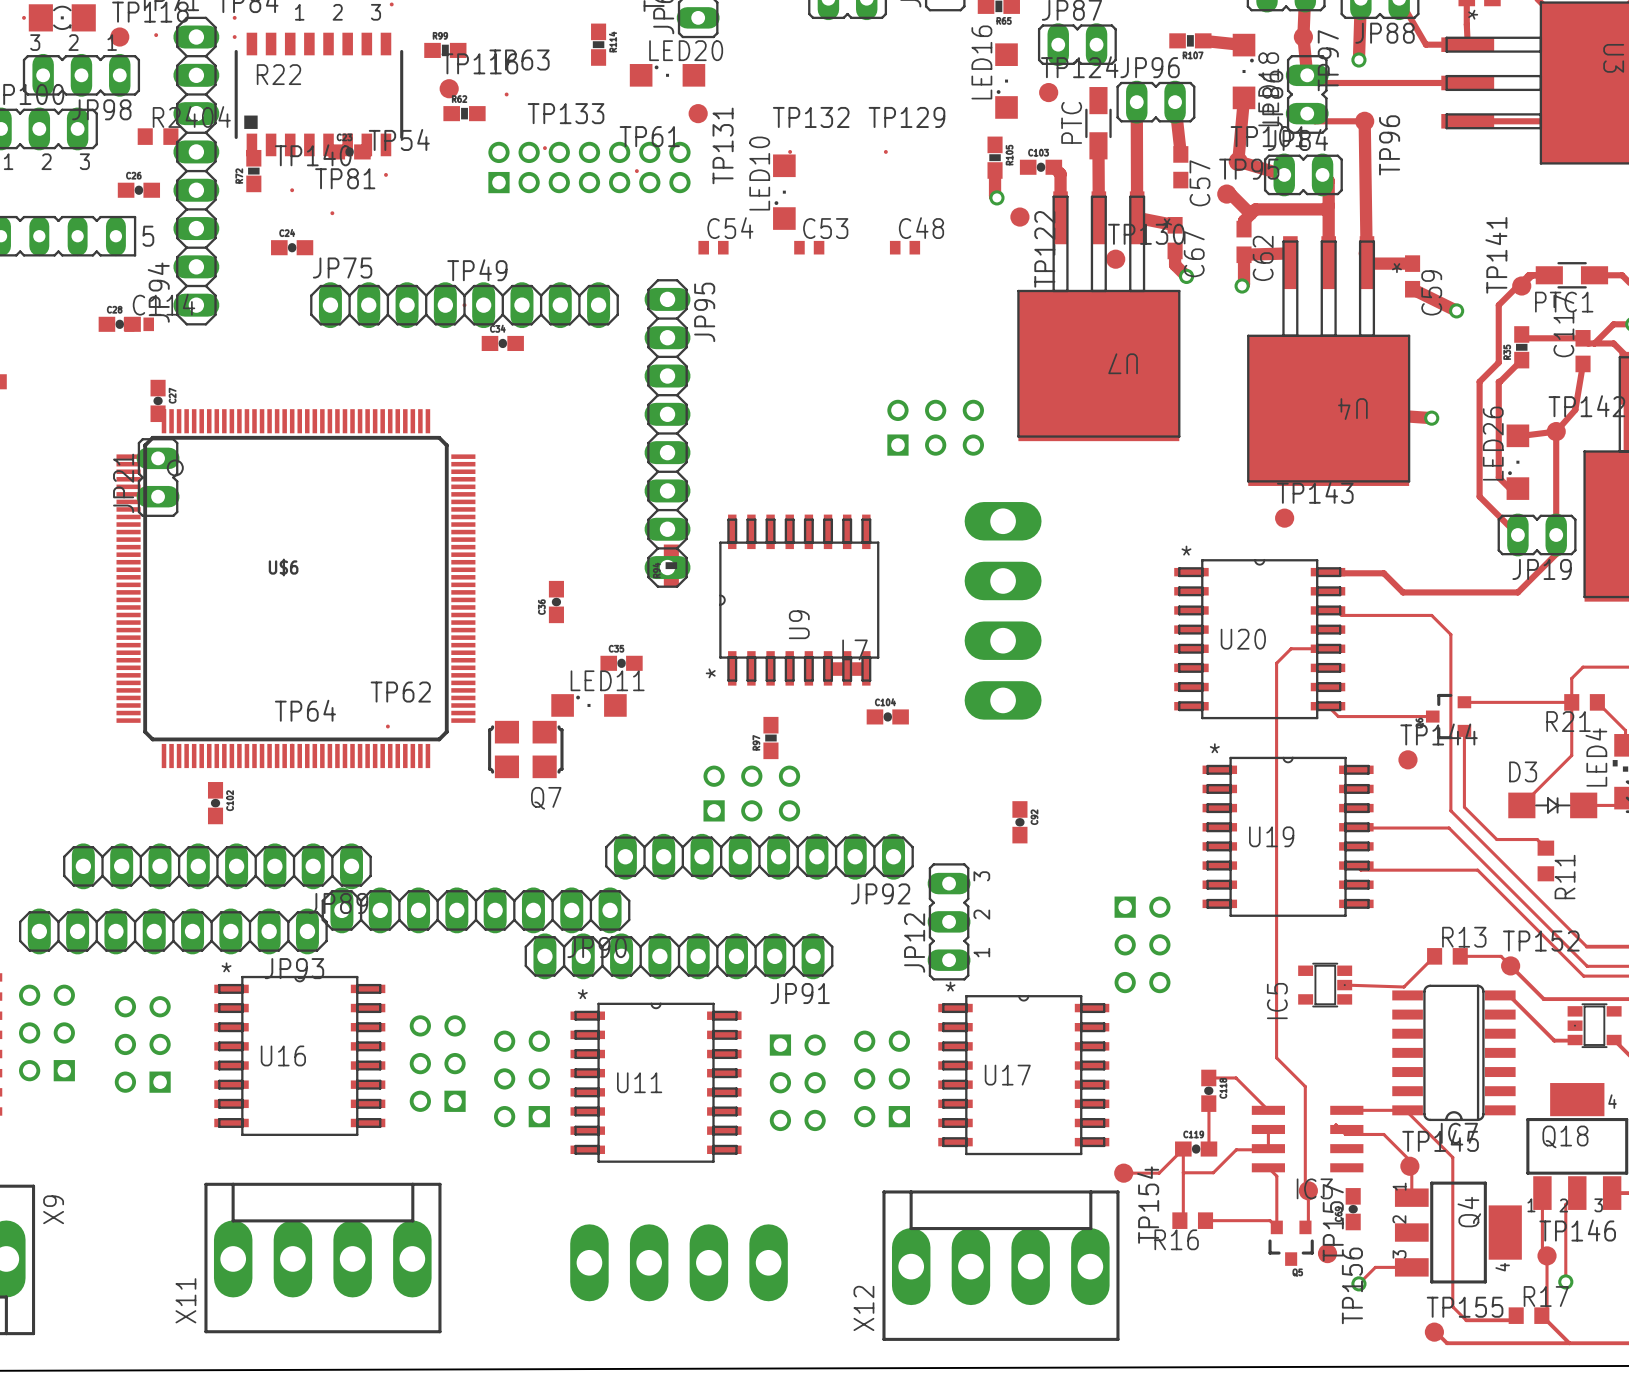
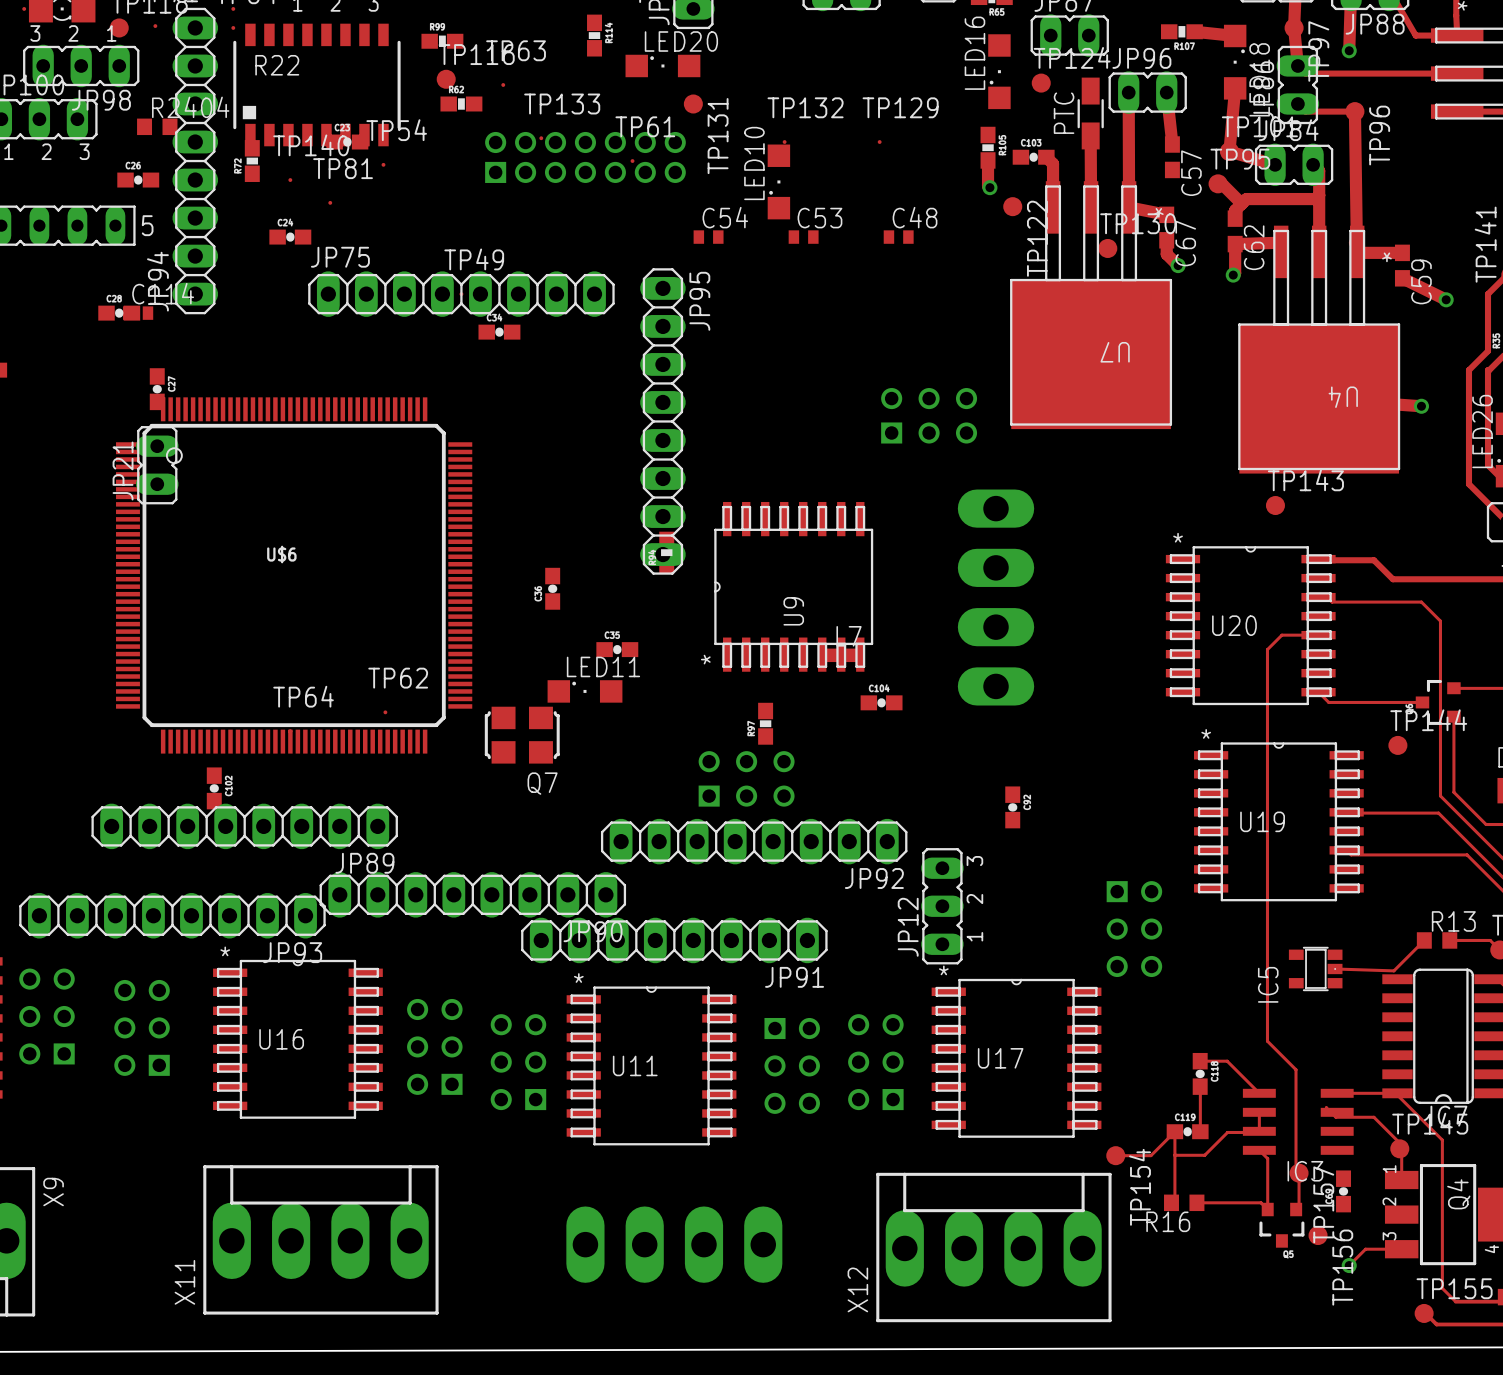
JP89 position: (217, 866) -> (244, 826)

